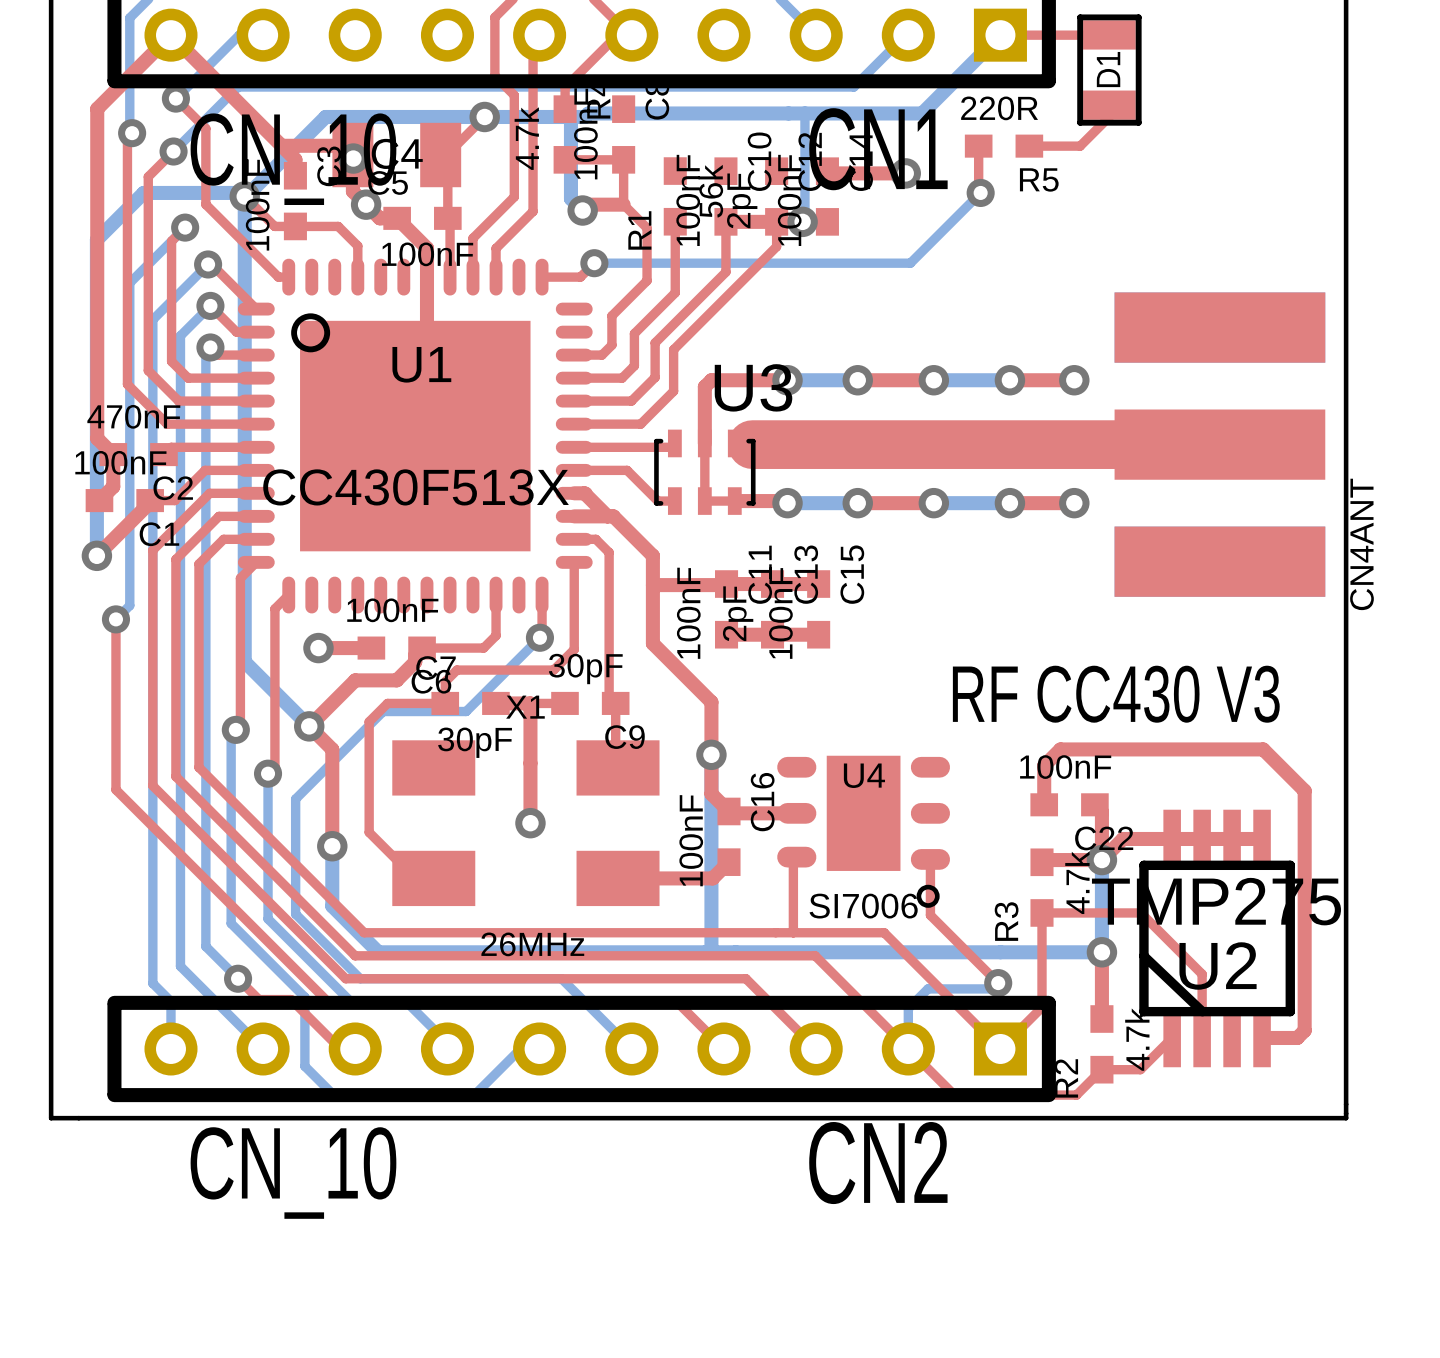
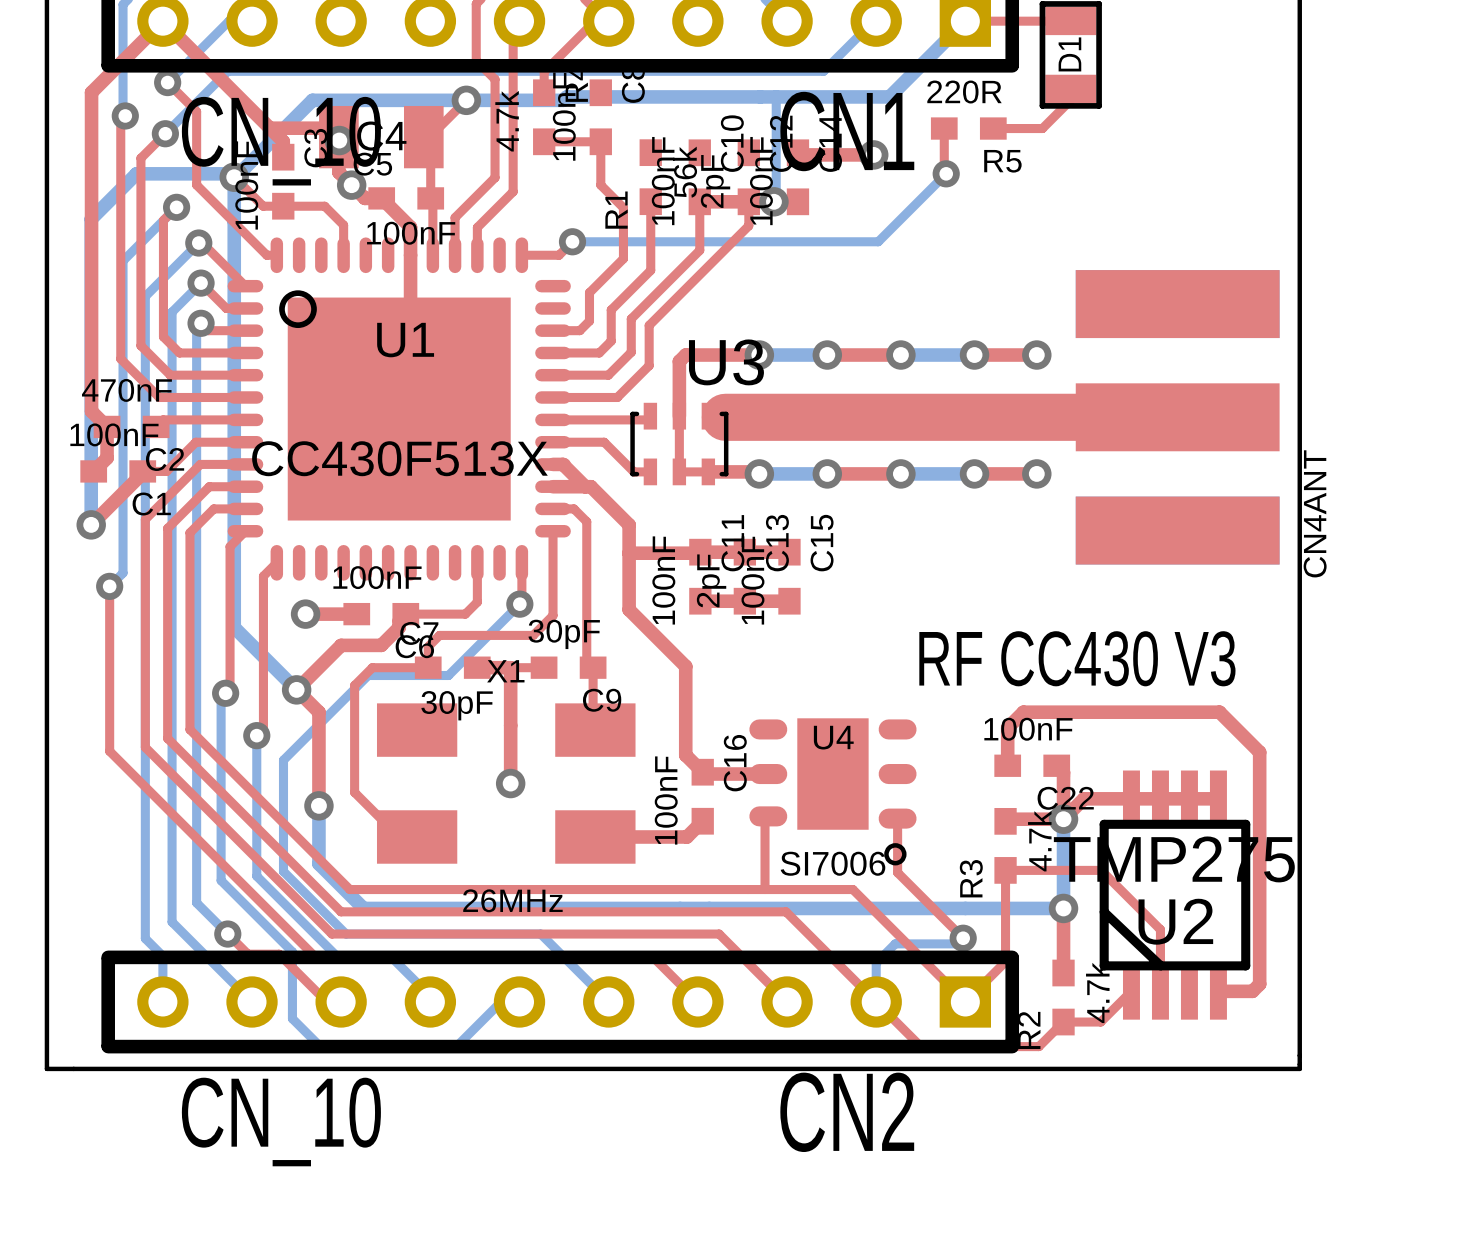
bottom track: (570, 116) (570, 198) (582, 210) -> none
top track: (623, 204) (588, 204) (582, 210) -> none
via: (582, 210) -> none
bottom track: (711, 754) (711, 952) -> none
via: (711, 754) -> none

